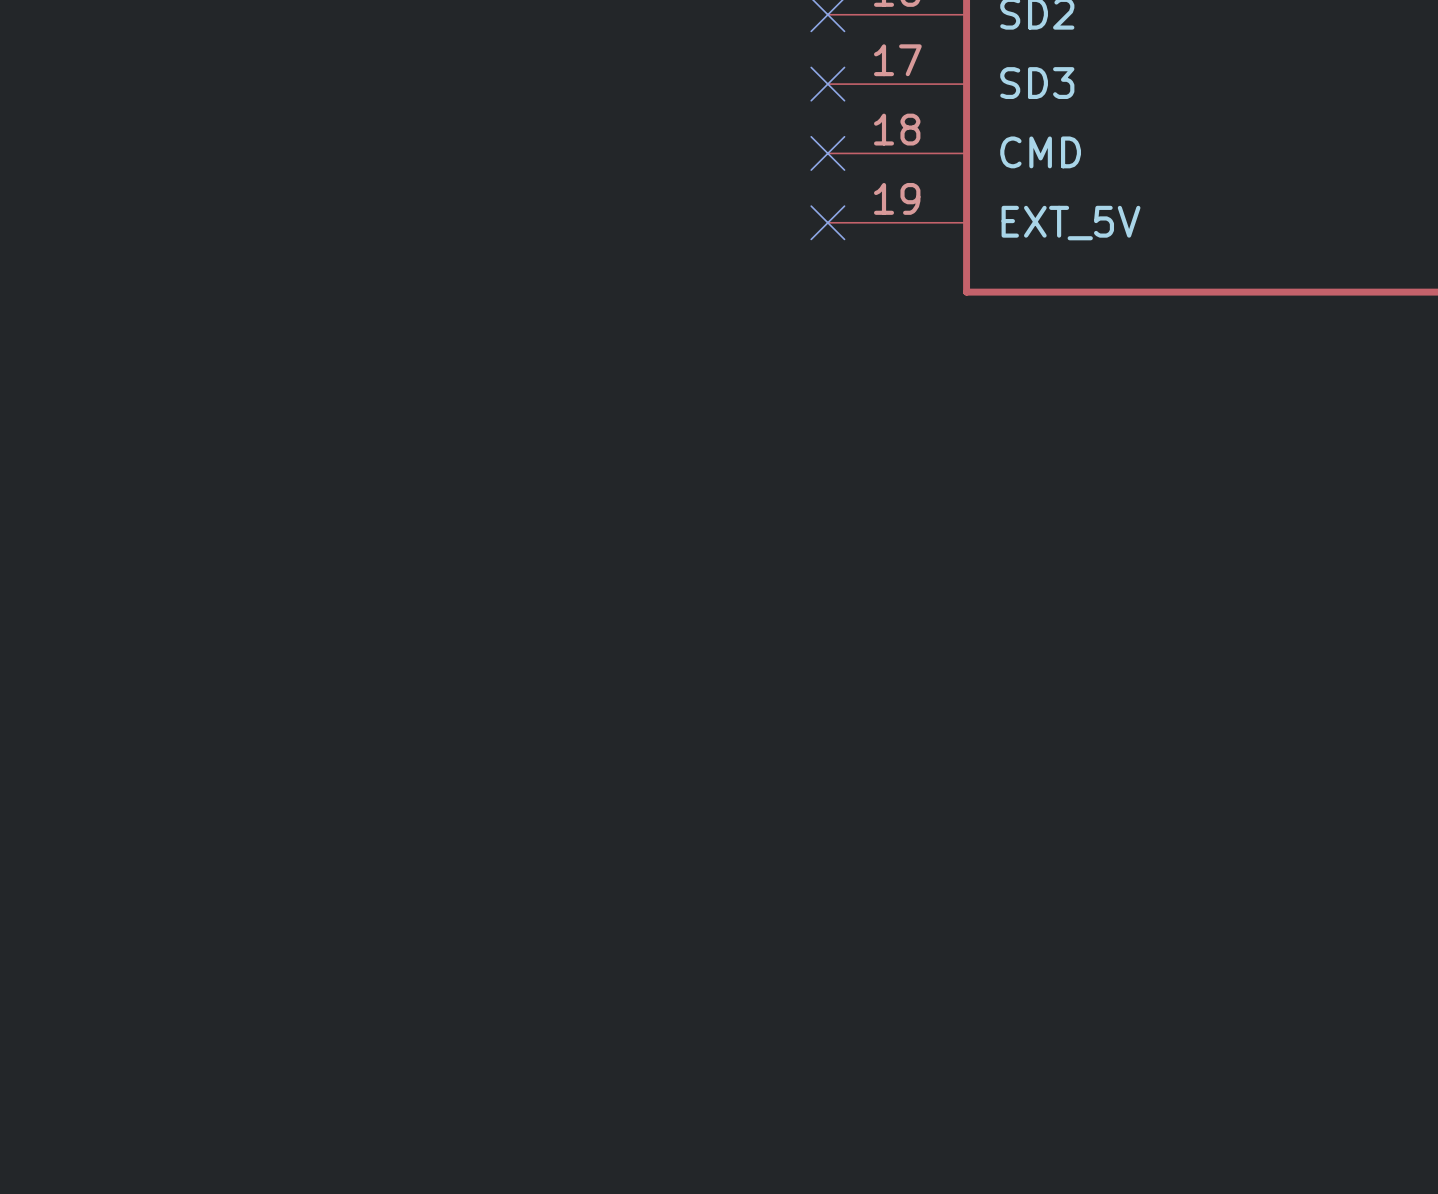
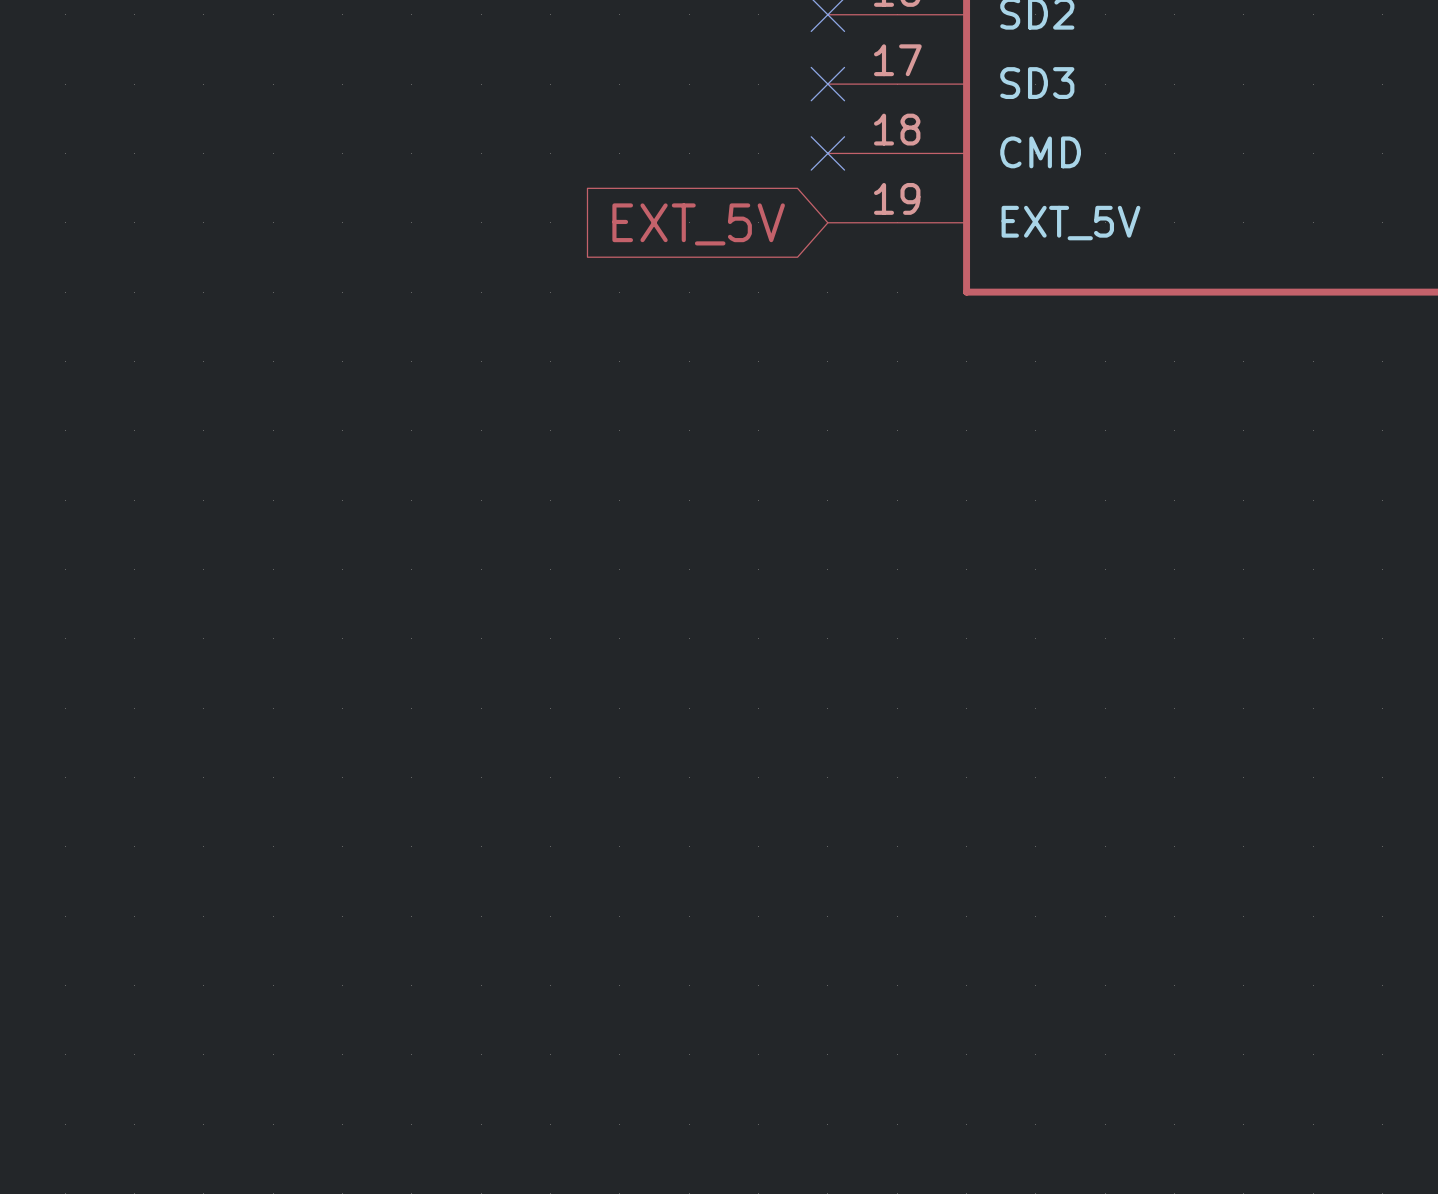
no-connect mark: (827, 222) -> none
global label: none -> EXT_5V (698, 224)

